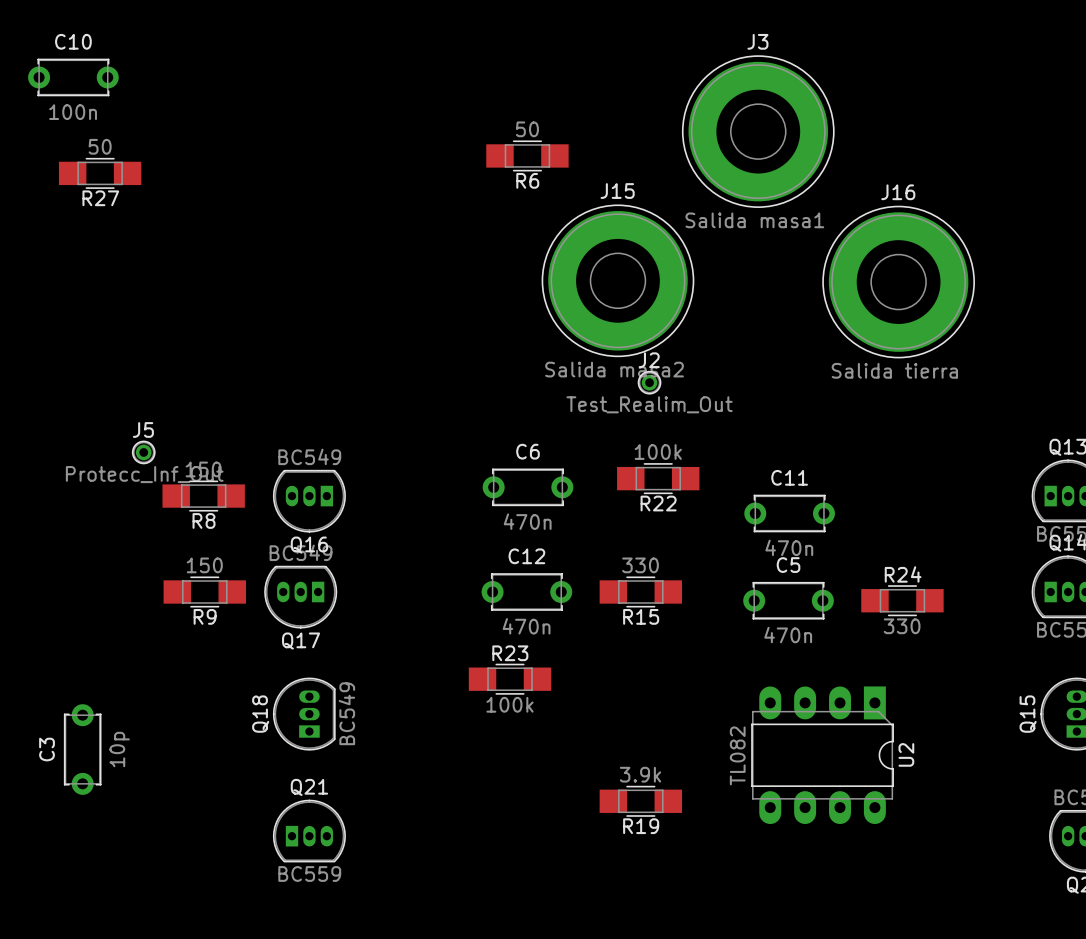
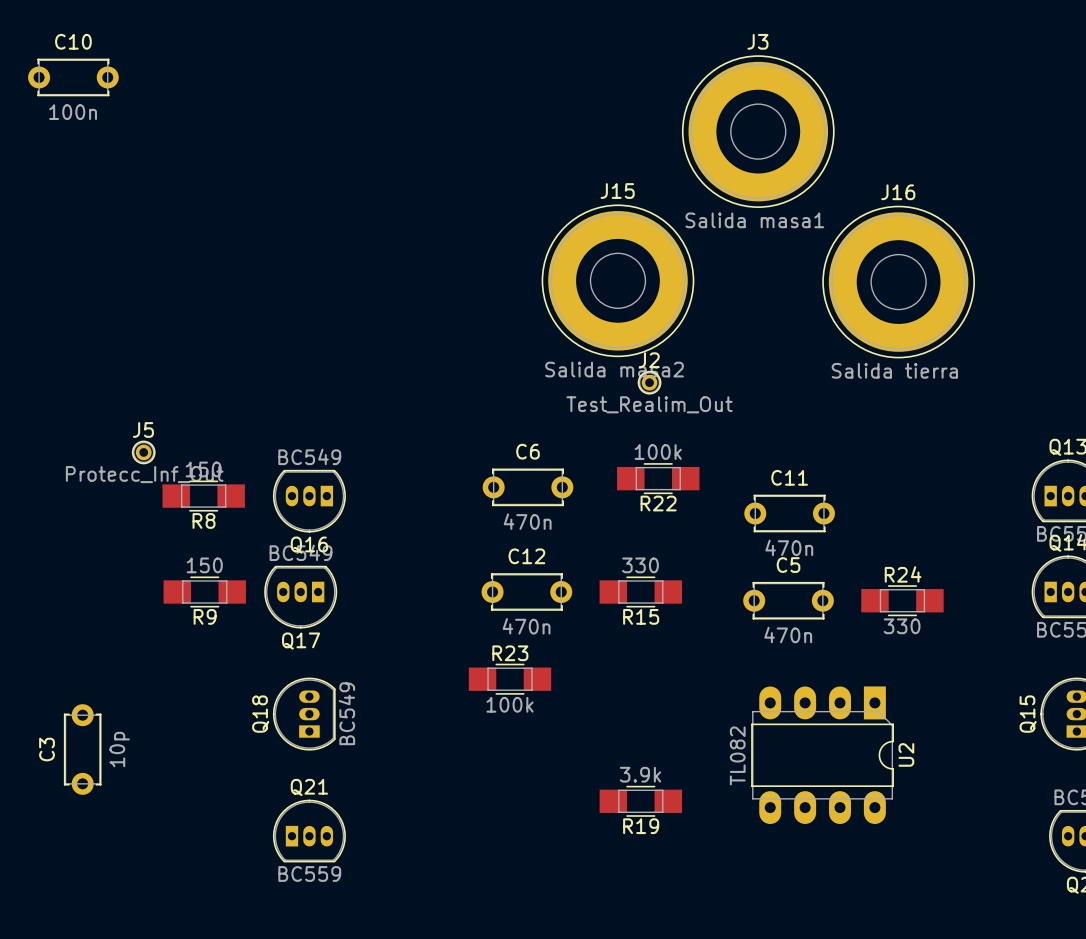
R6: 50 (527, 155) -> none
R27: 50 (100, 173) -> none

